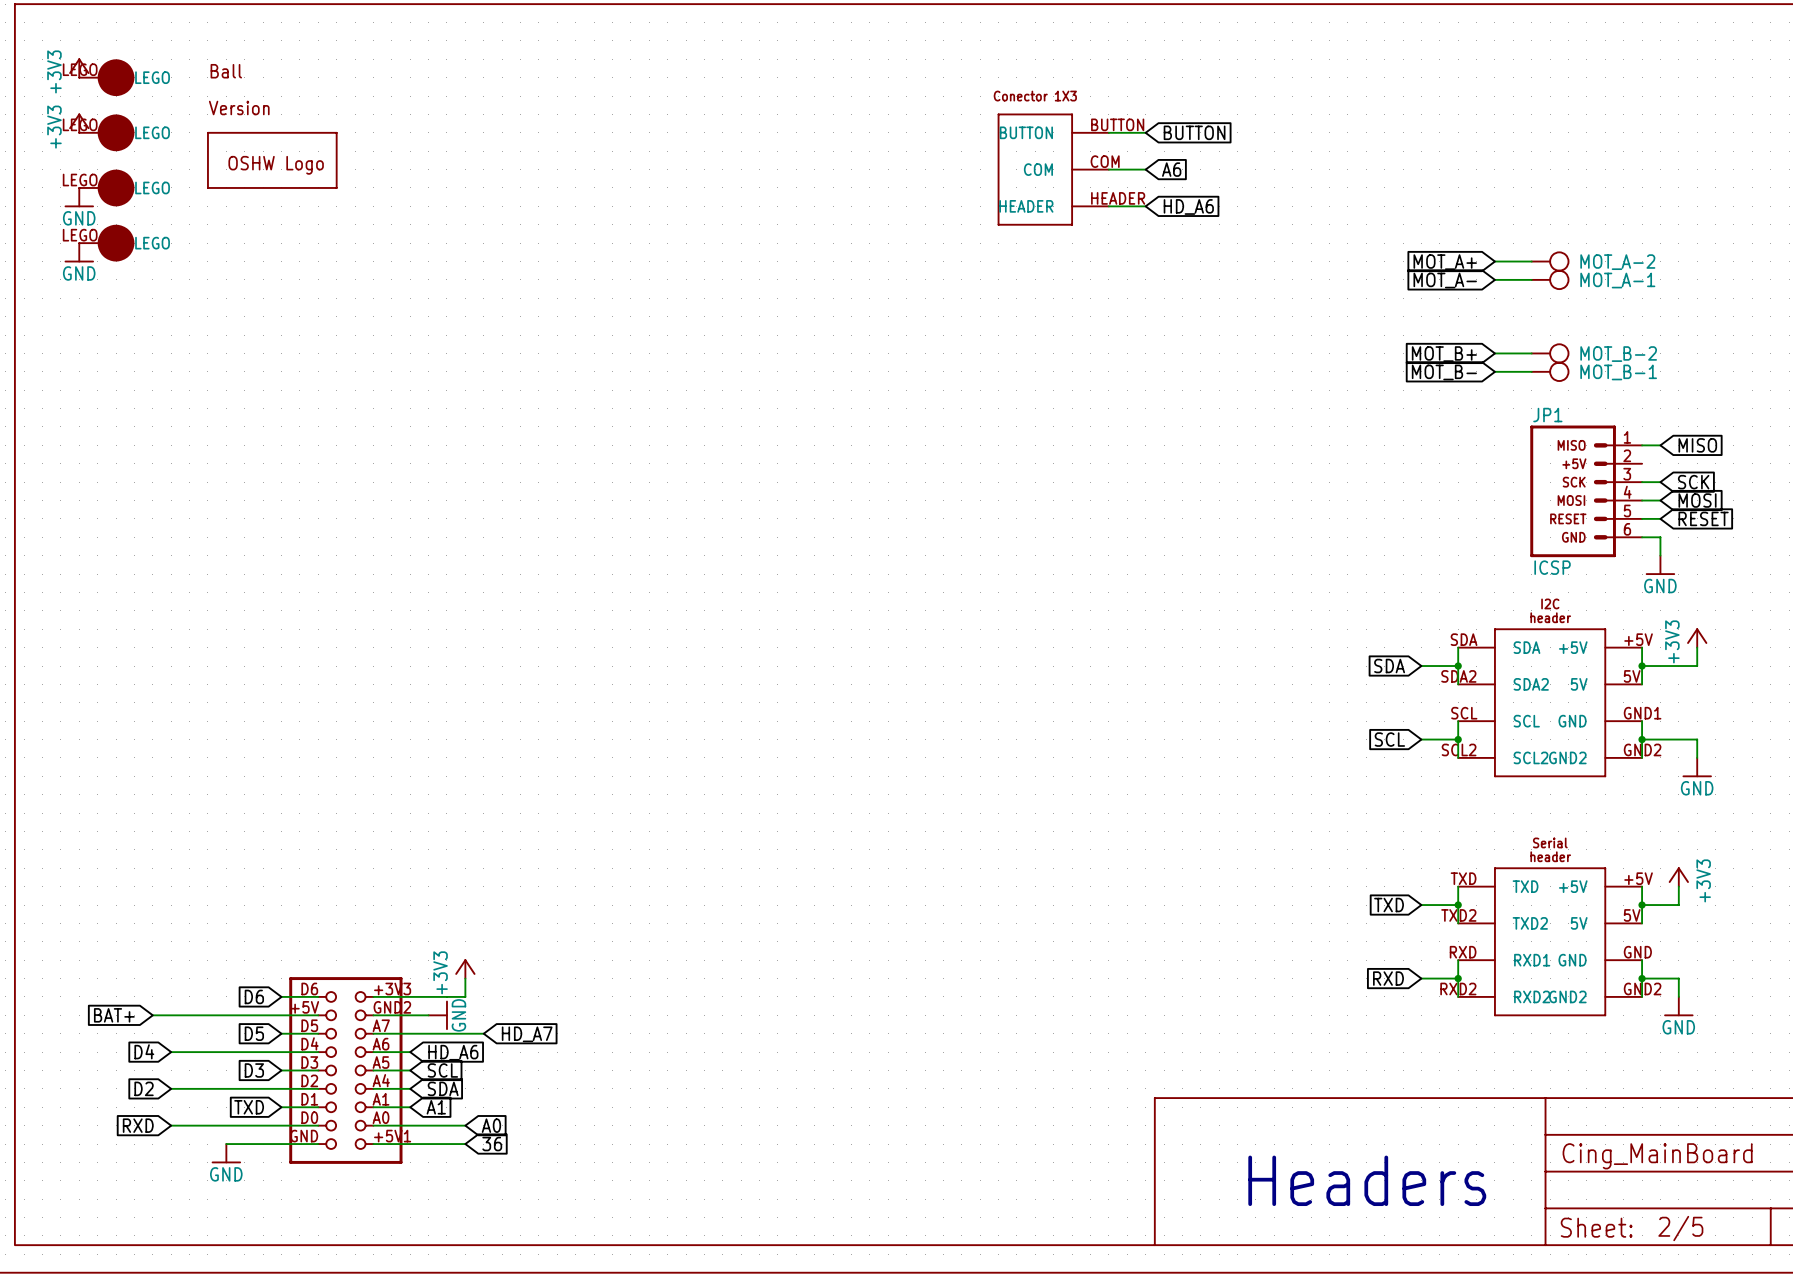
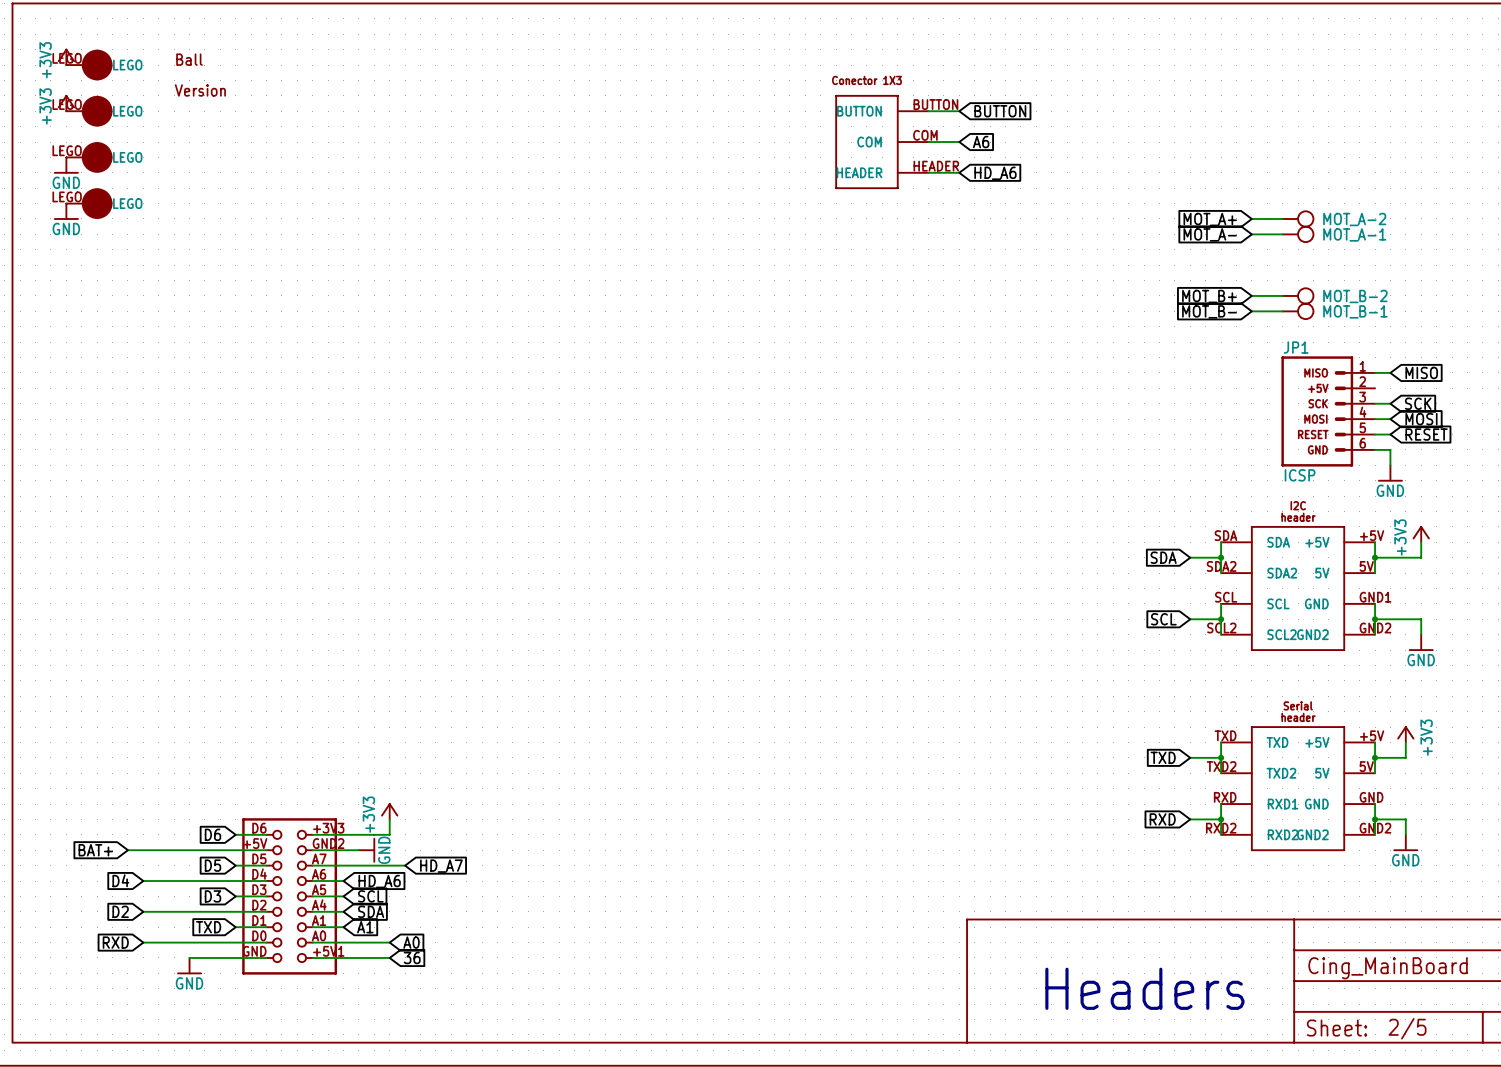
part: (272, 160) -> none

